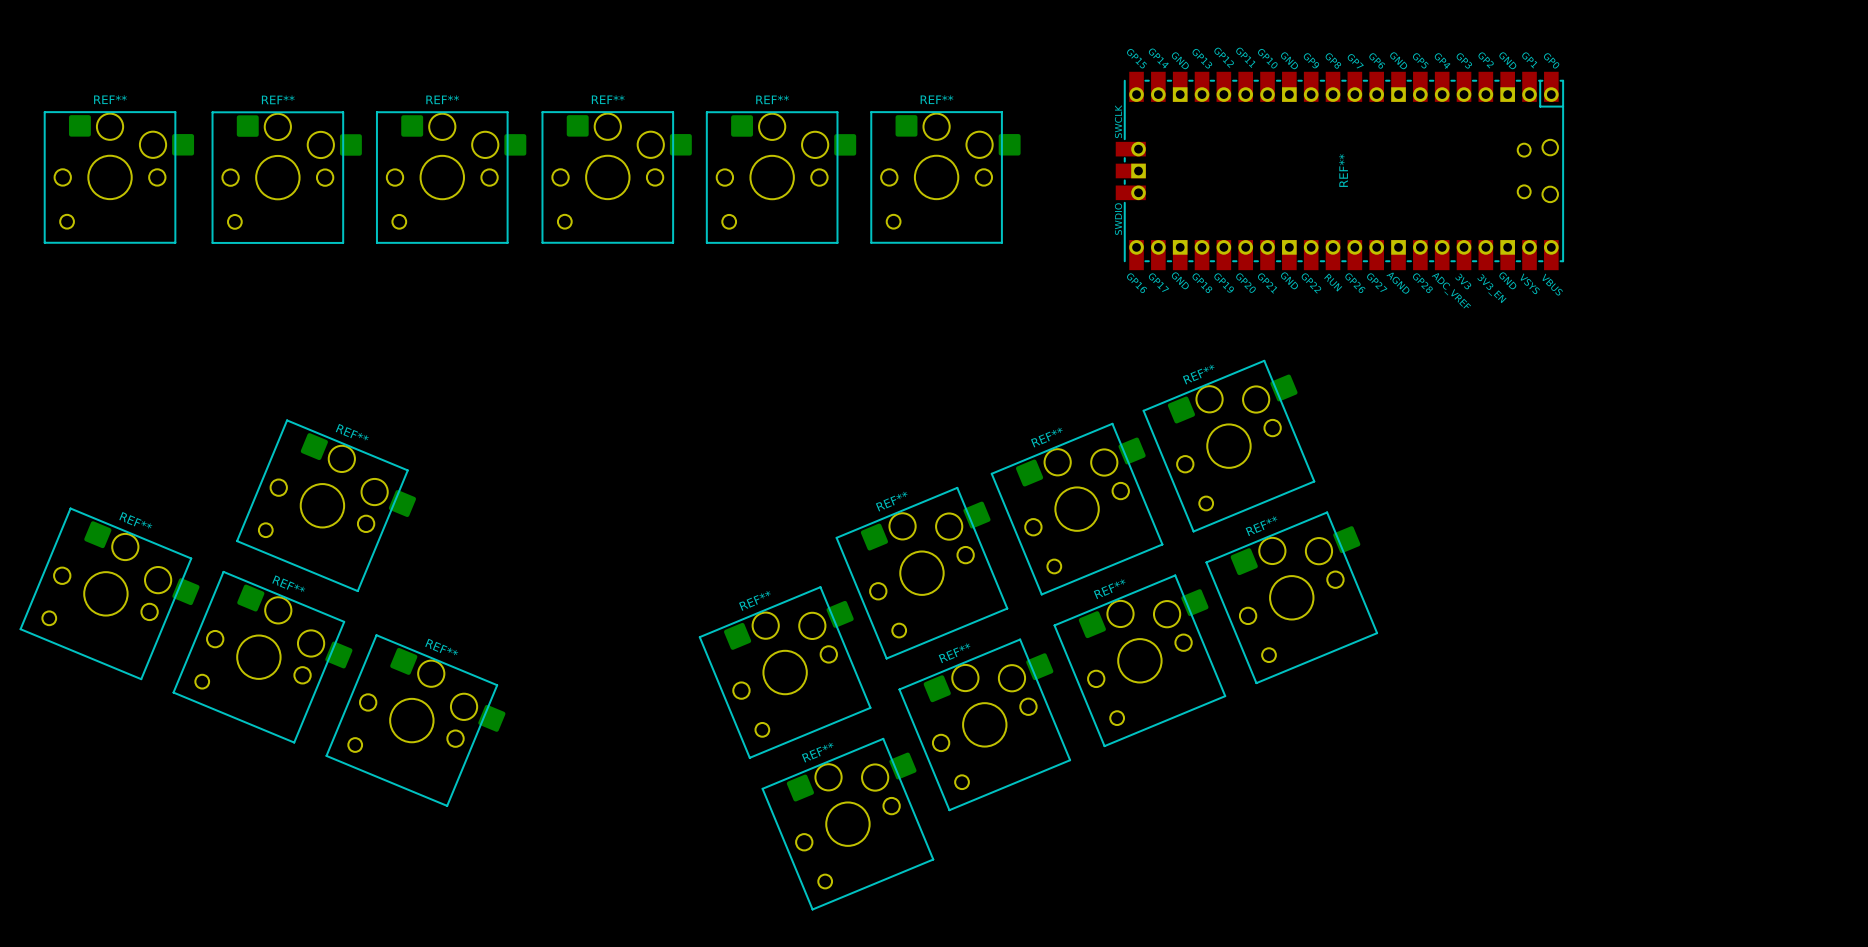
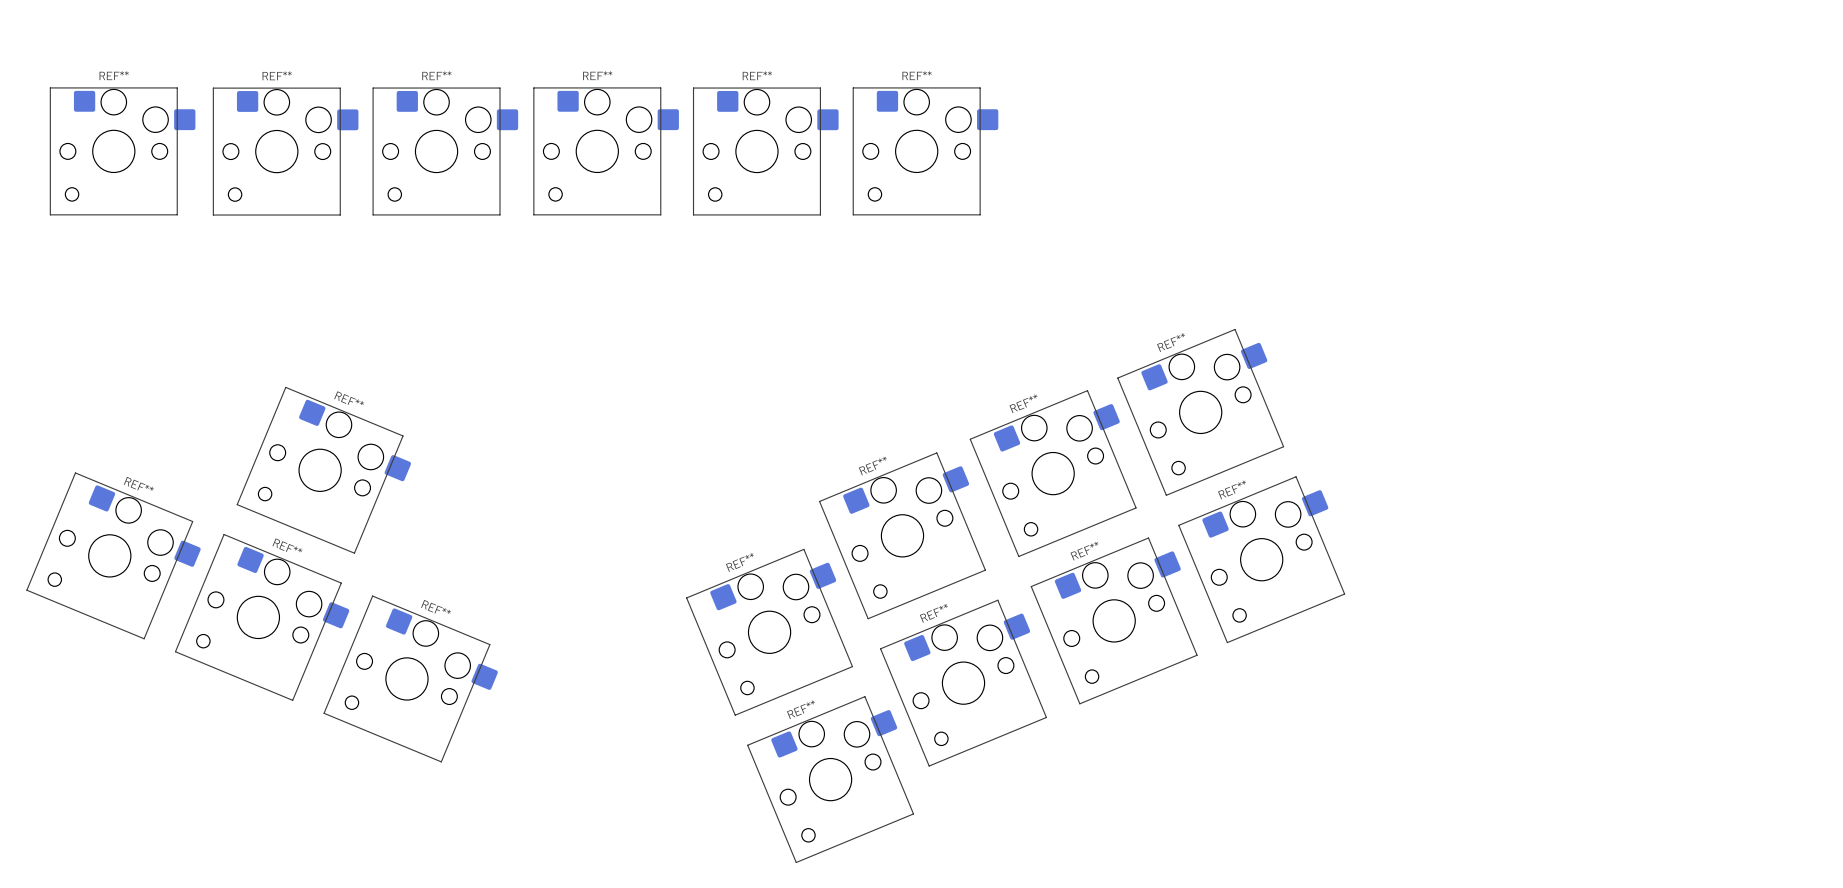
REF**: (1339, 170) -> none

